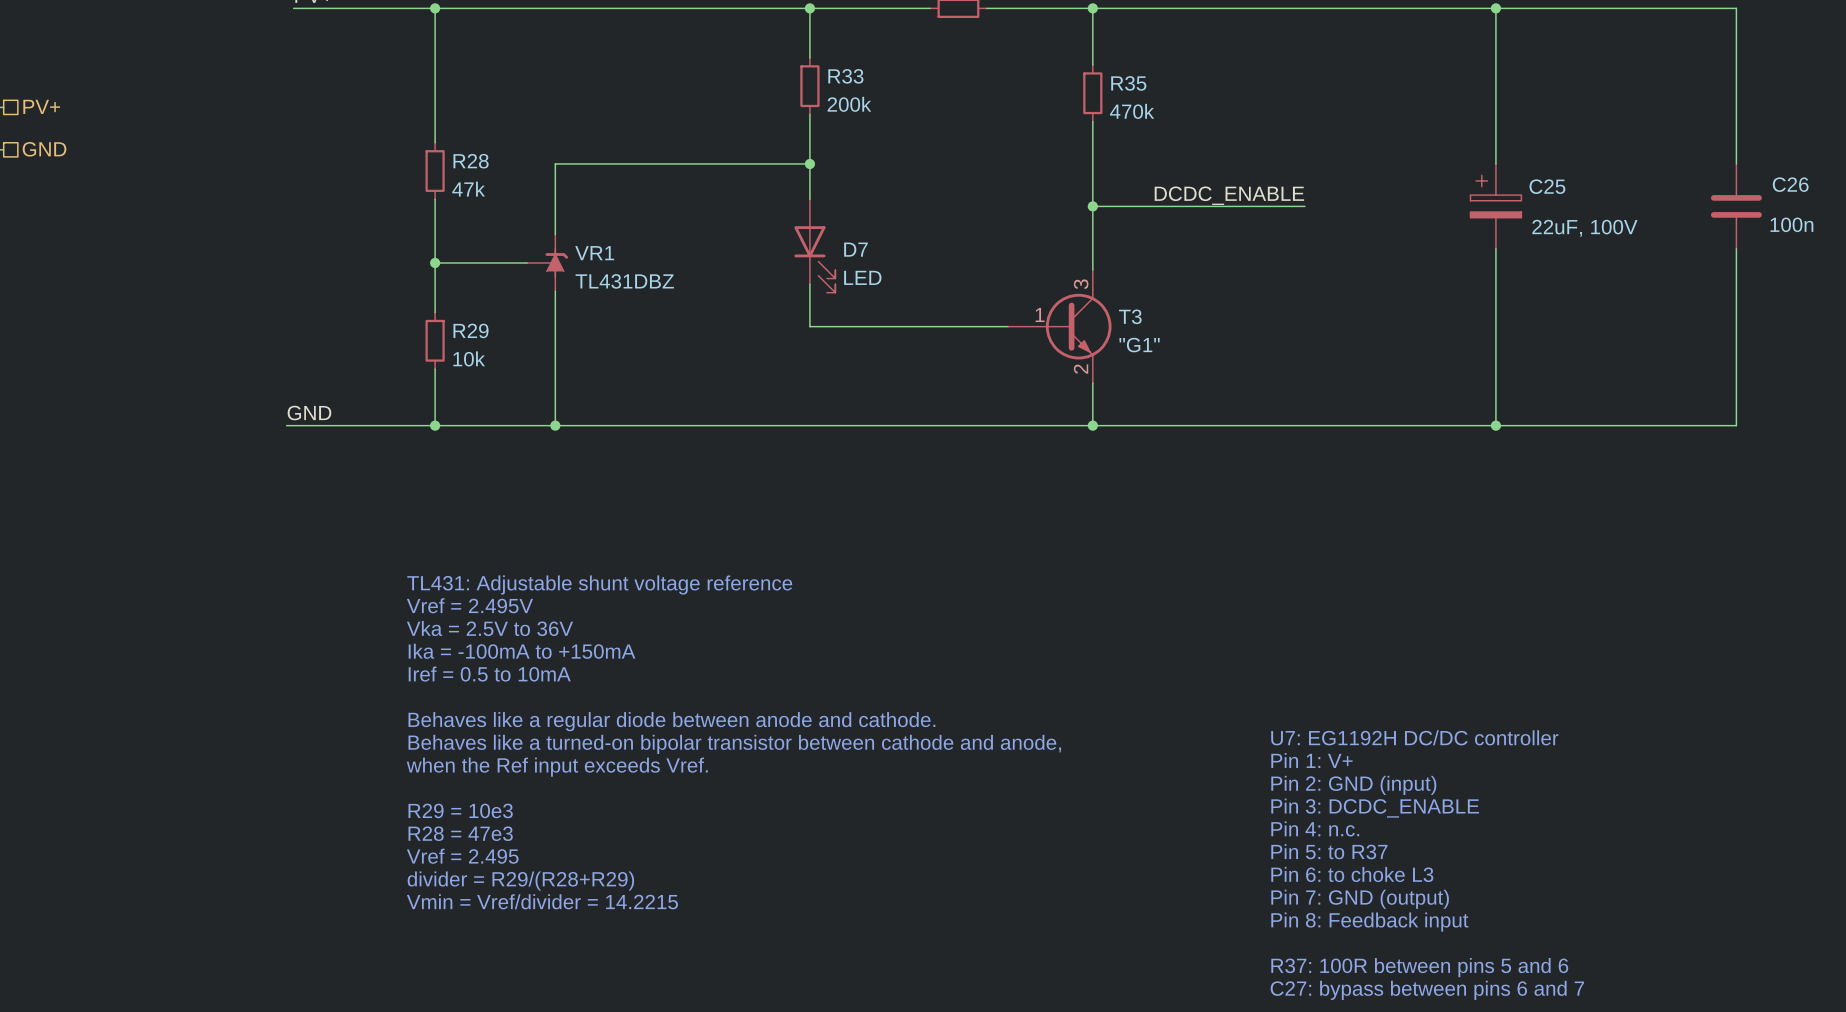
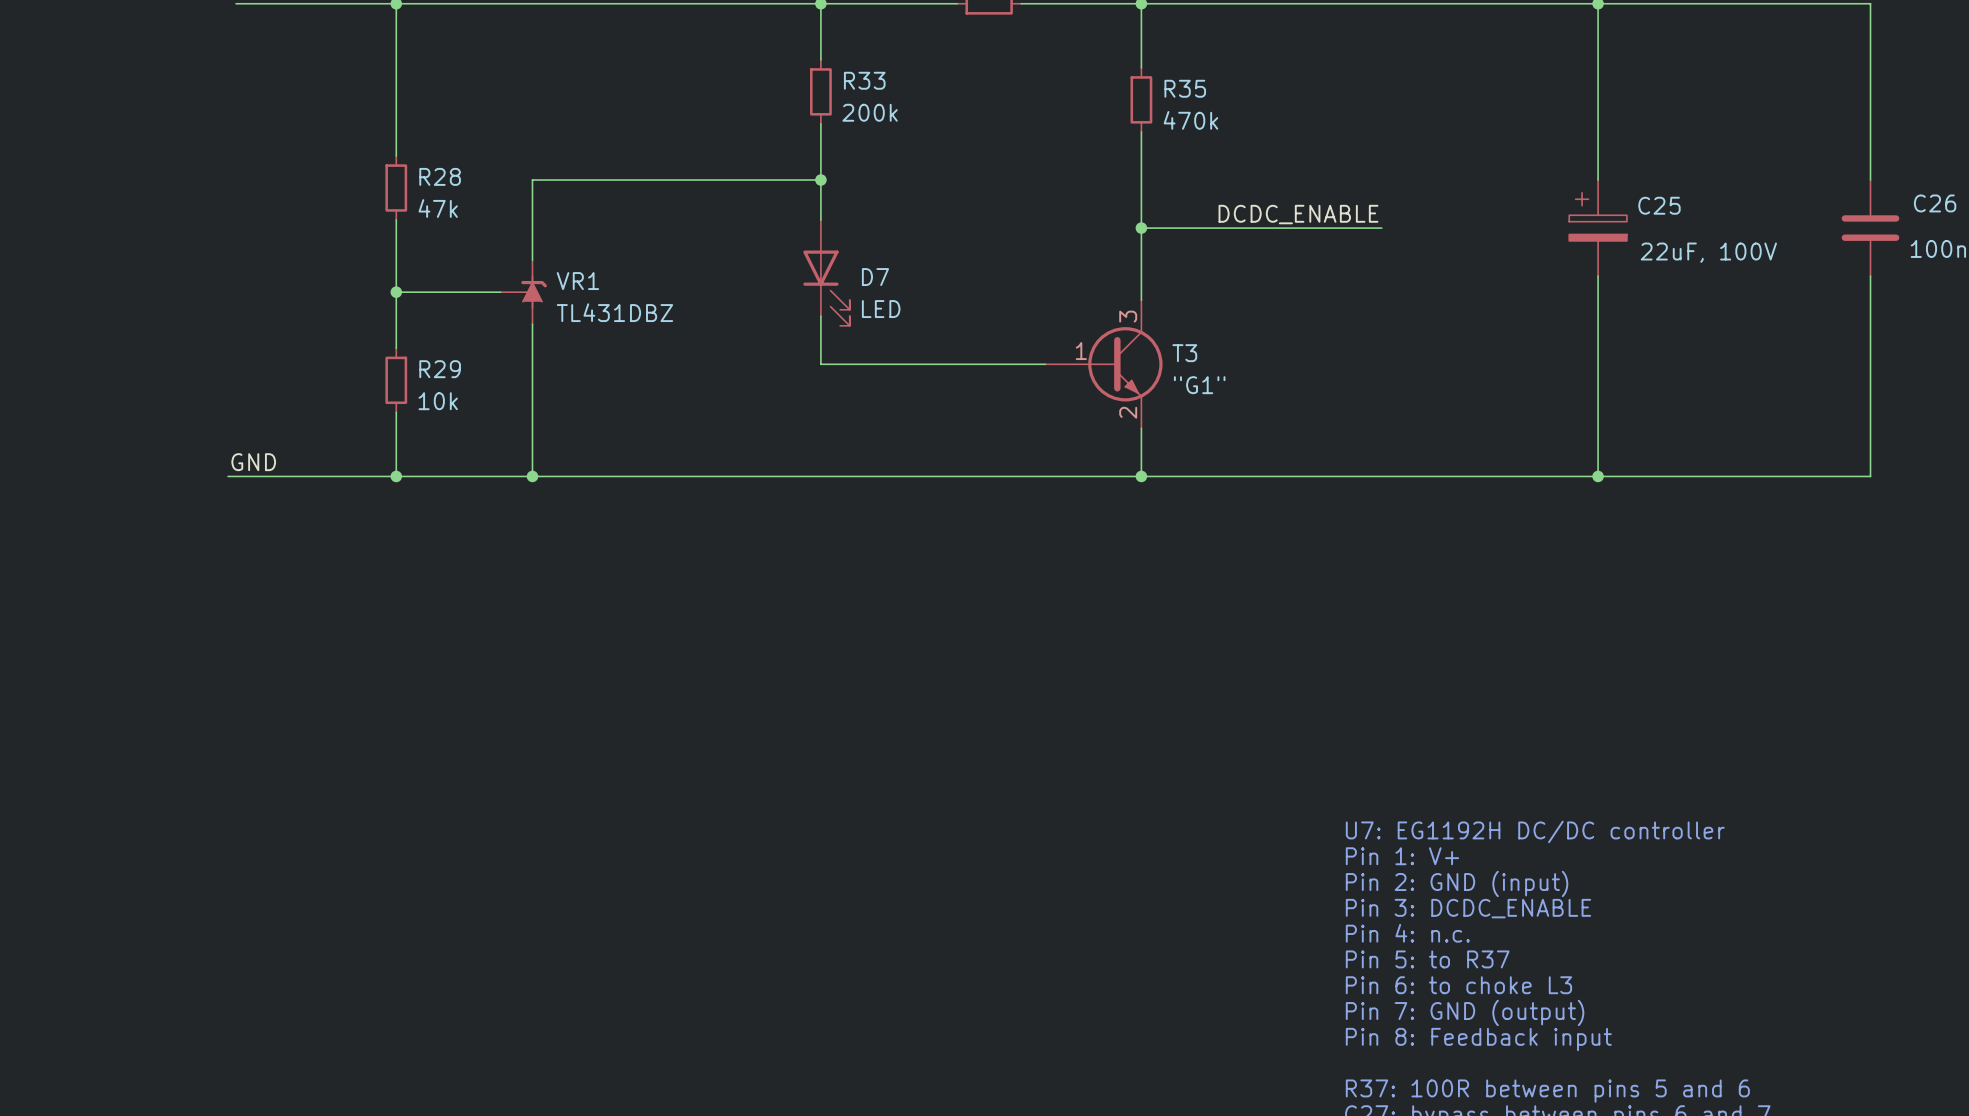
text: TL431: Adjustable shunt voltage reference (599, 584) -> none
text: Vref = 2.495V (469, 605) -> none
text: Vka = 2.5V to 36V (489, 628) -> none
text: Ika = -100mA to +150mA (522, 651) -> none
text: Iref = 0.5 to 10mA (489, 674) -> none
text: Behaves like a regular diode between anode and cathode. (671, 721) -> none
text: Behaves like a turned-on bipolar transistor between cathode and anode, (734, 744) -> none
text: when the Ref input exceeds Vref. (557, 767) -> none
text: R29 = 10e3 (460, 810) -> none
text: R28 = 47e3 (460, 833) -> none
text: Vref = 2.495 (462, 856) -> none
text: divider = R29/(R28+R29) (520, 881) -> none
text: Vmin = Vref/divider = 14.2215 (542, 901) -> none

